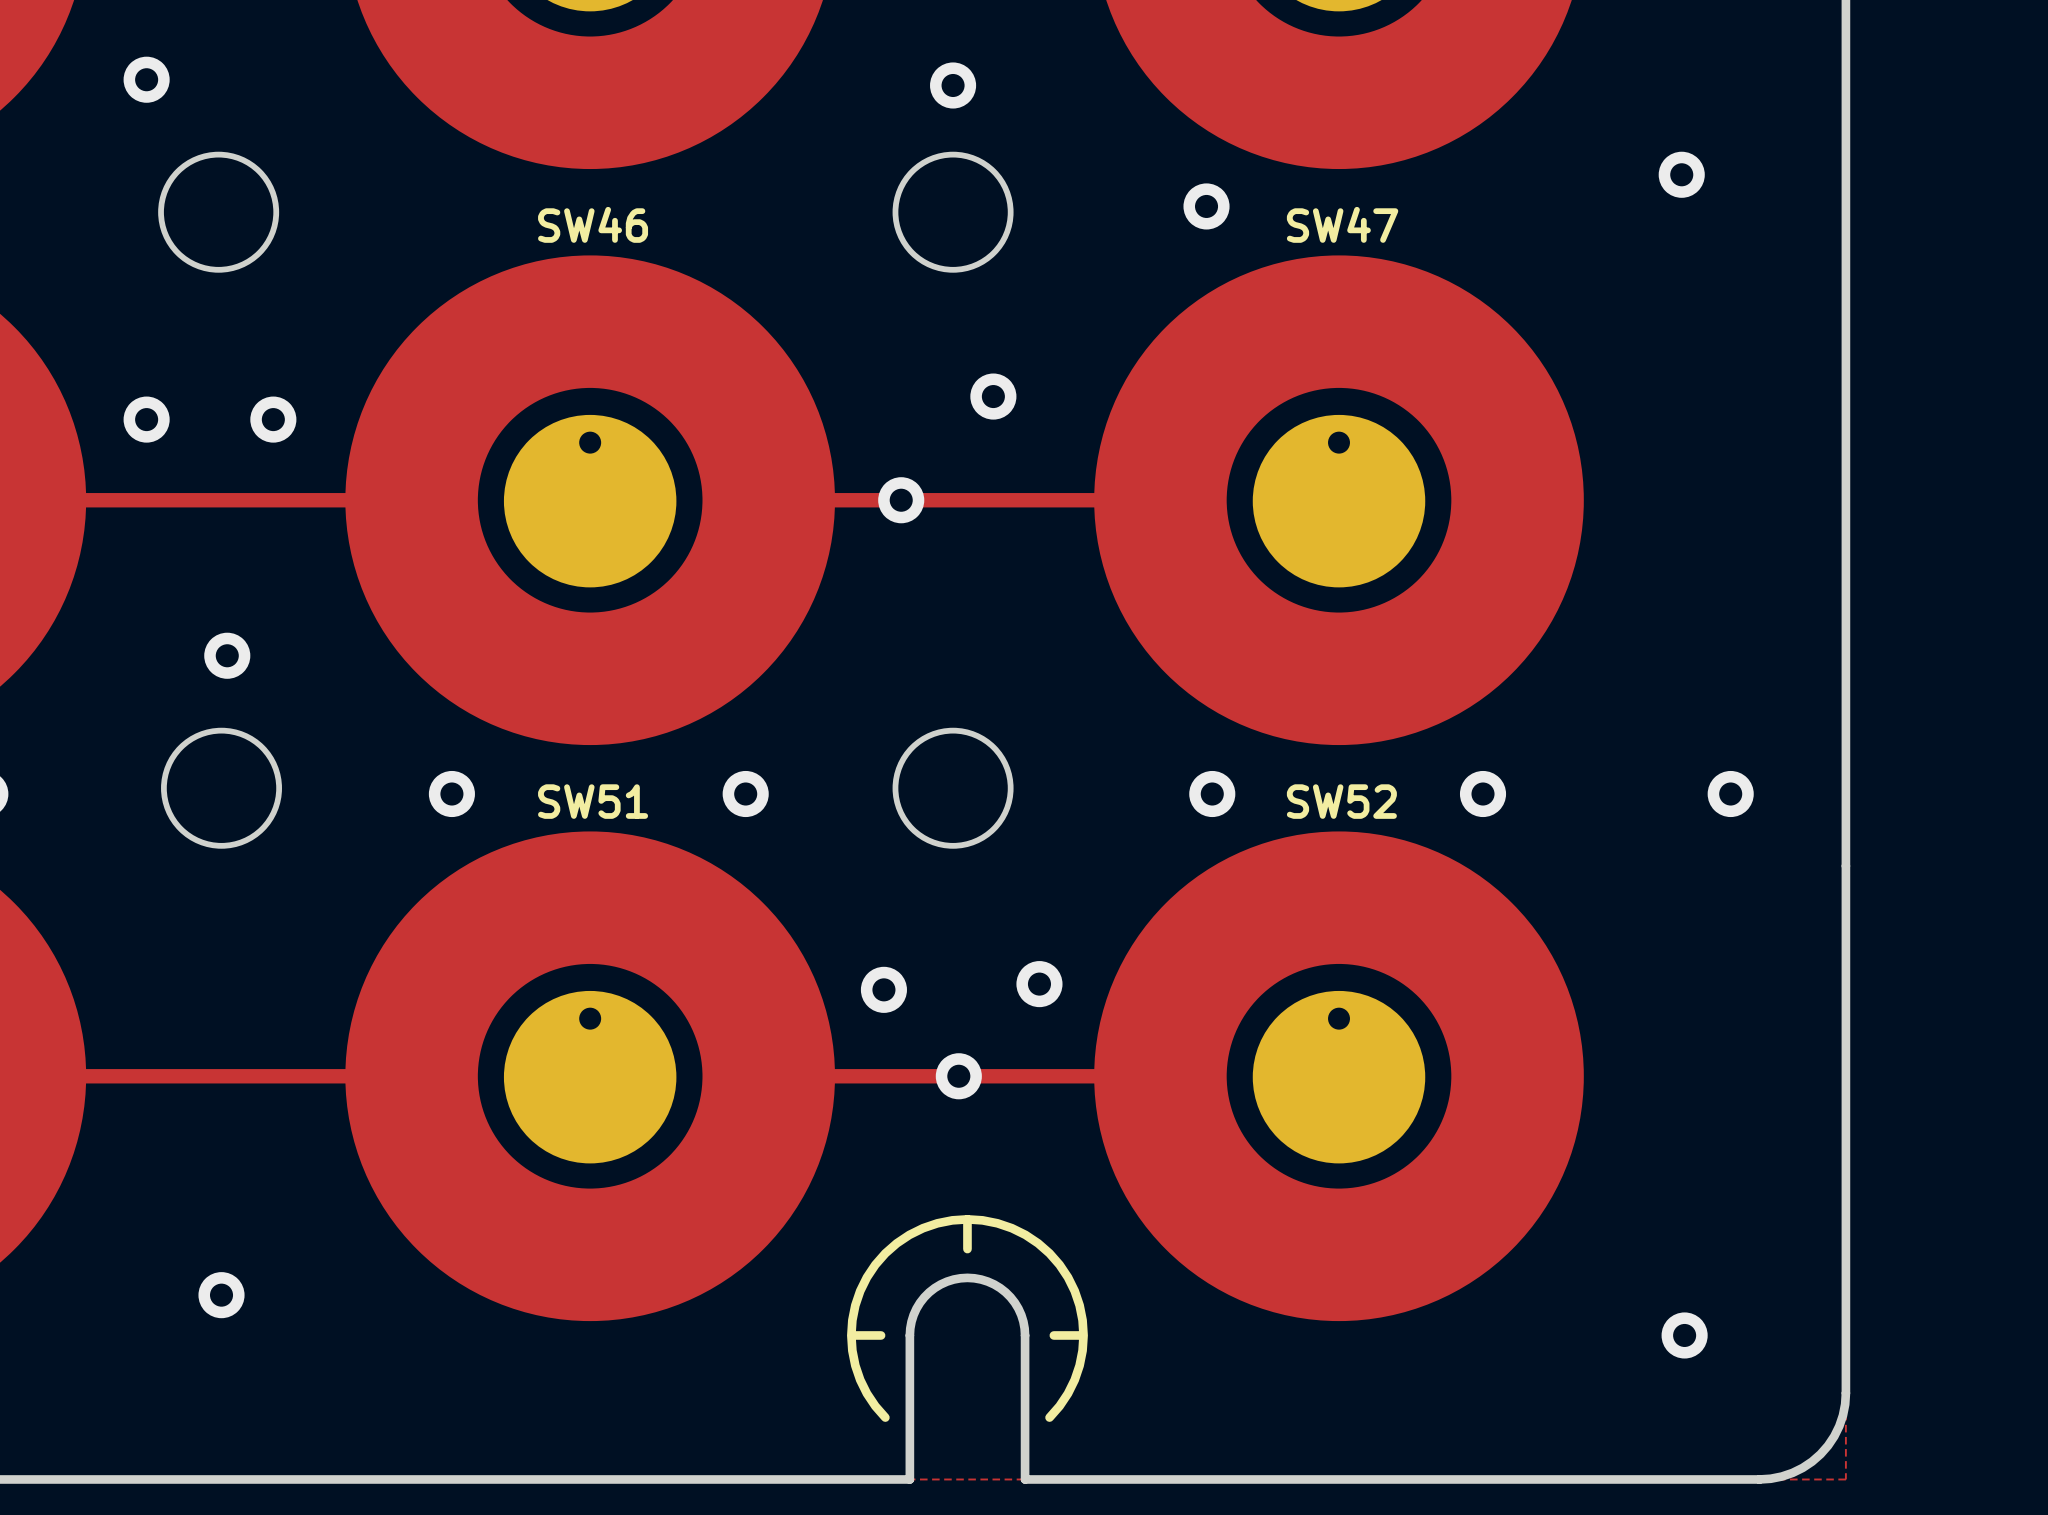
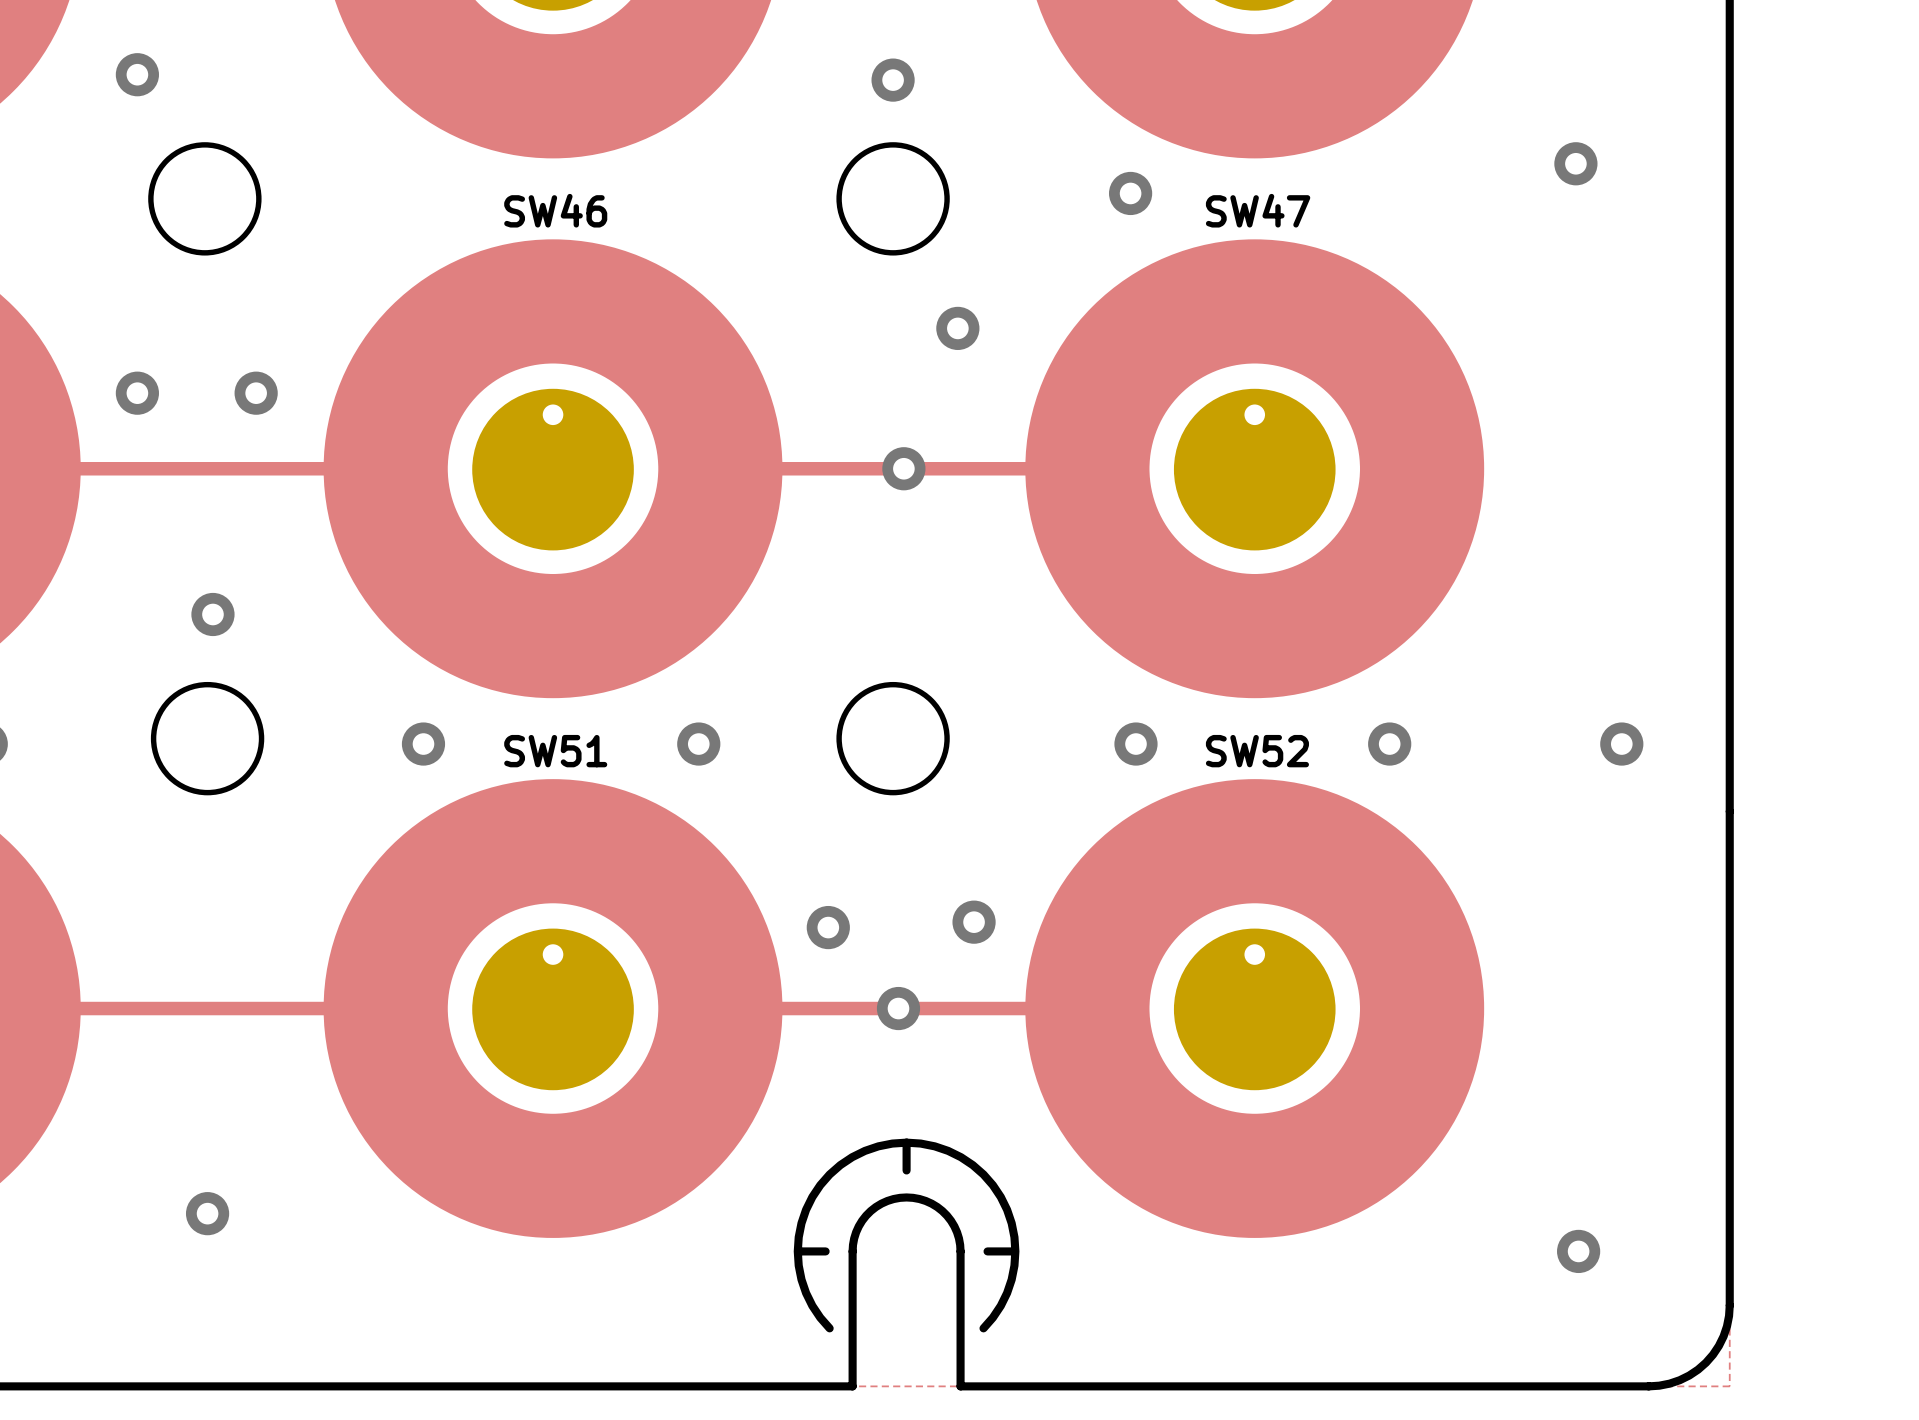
via position: (993, 396) -> (957, 328)
via: (901, 500) -> none
via: none -> (903, 468)

